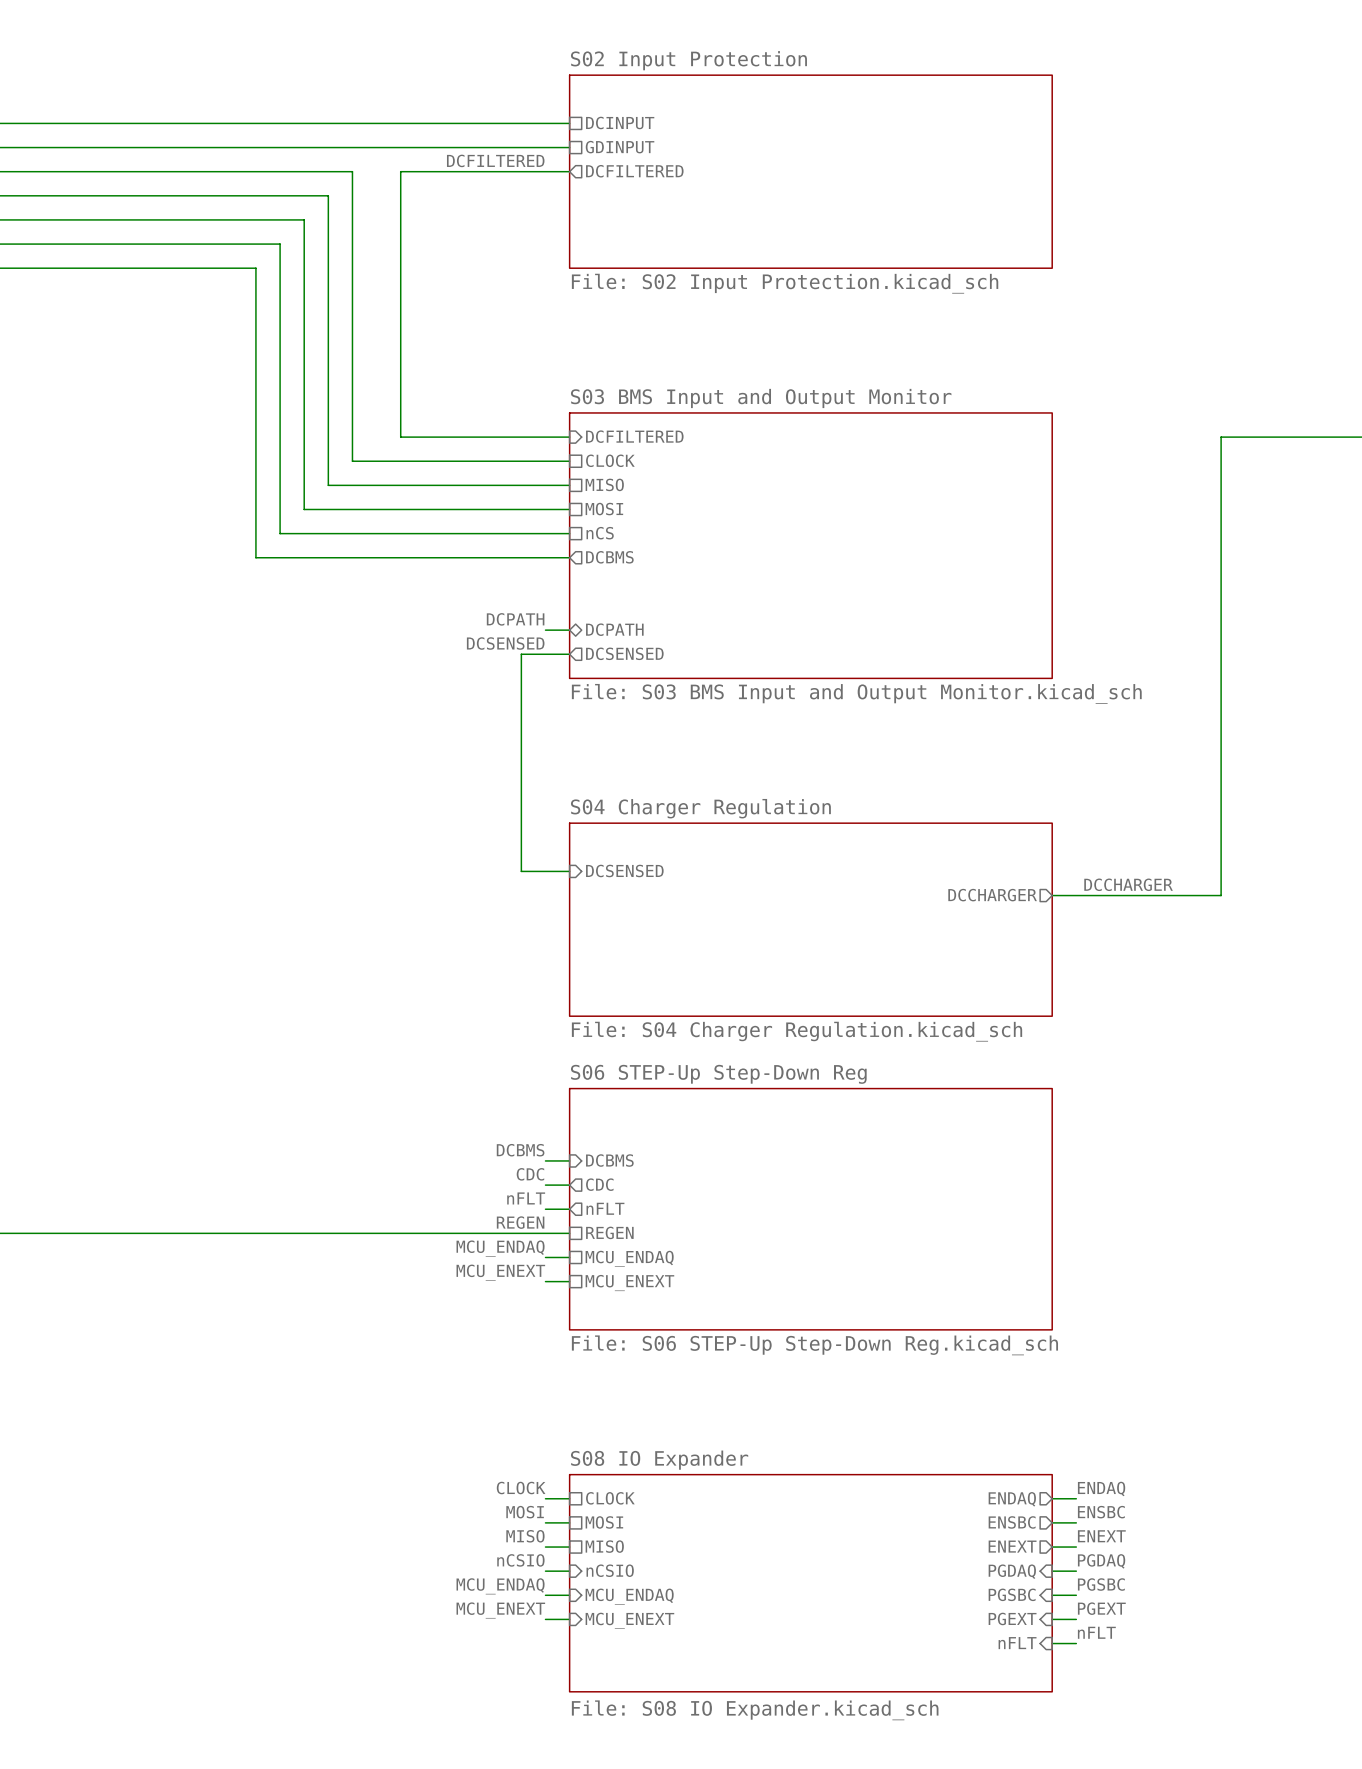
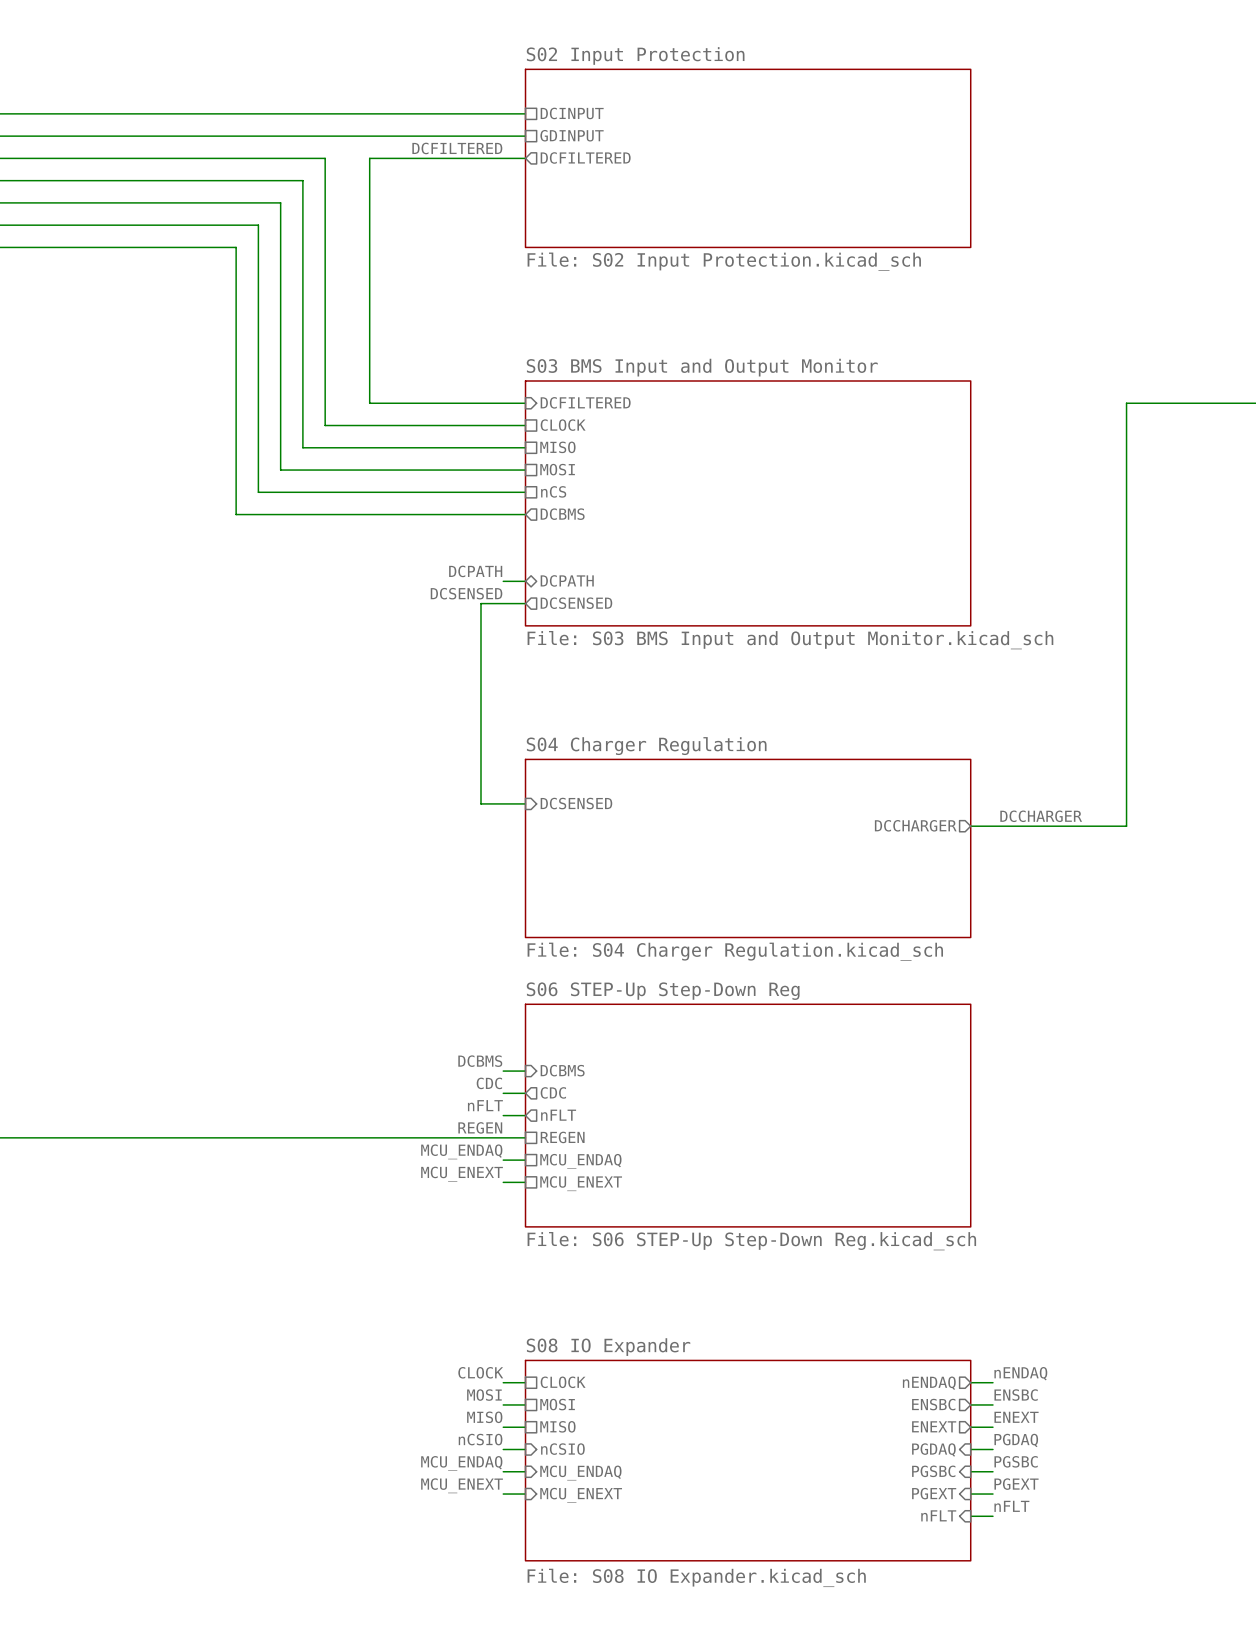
label: ENDAQ (1101, 1488) -> nENDAQ (1020, 1373)
sheet pin: ENDAQ (1012, 1499) -> nENDAQ (929, 1383)

